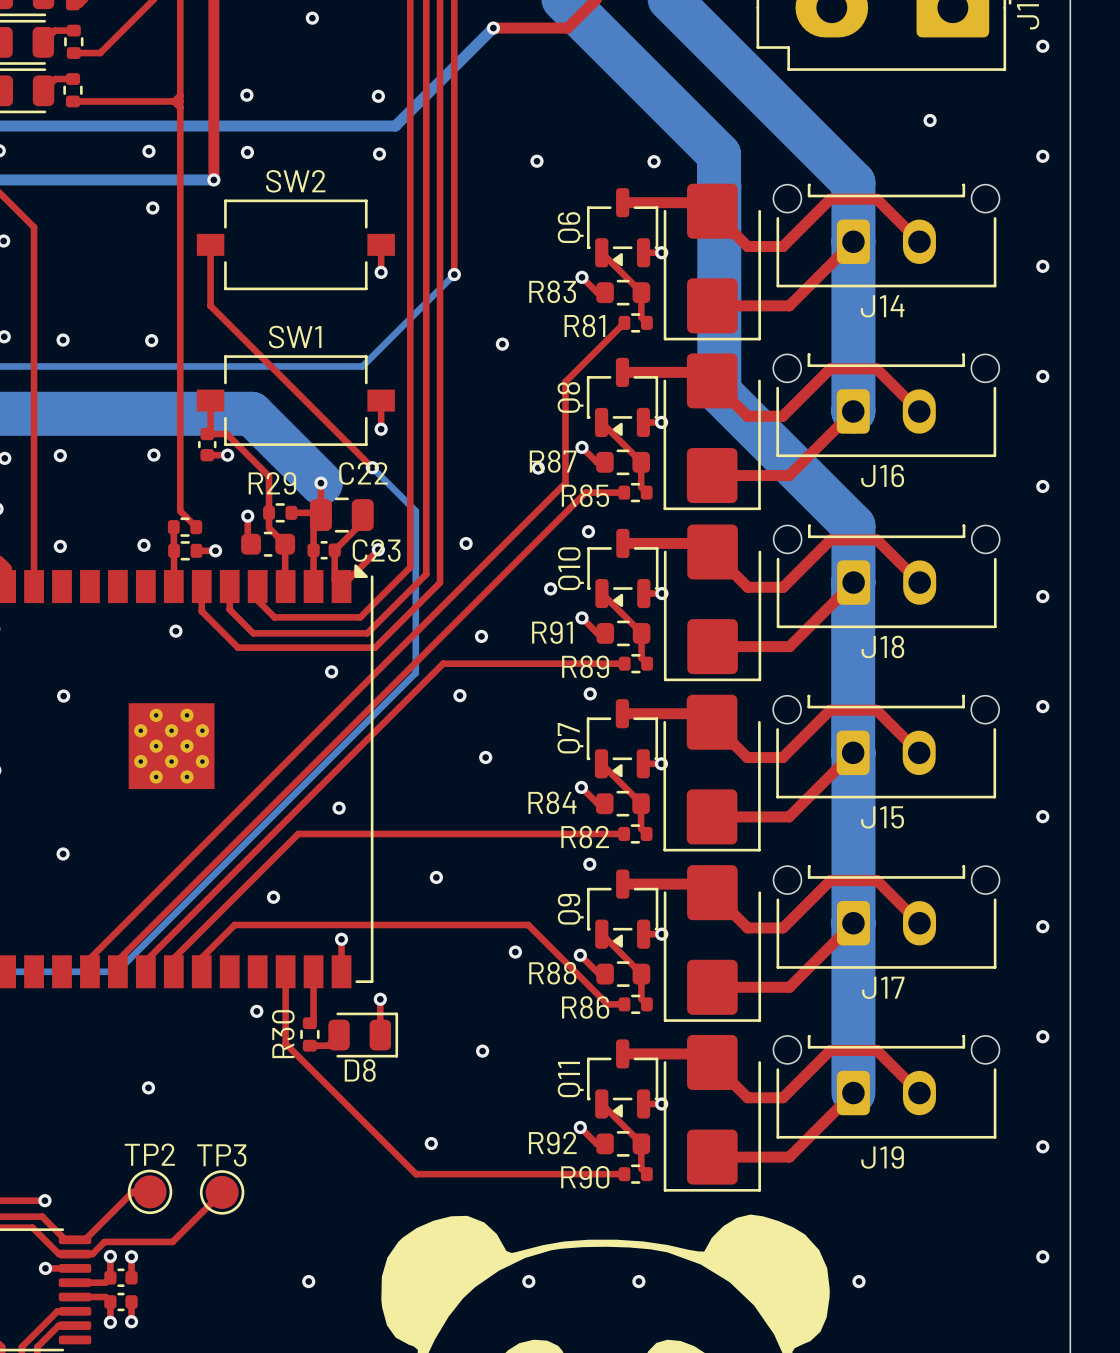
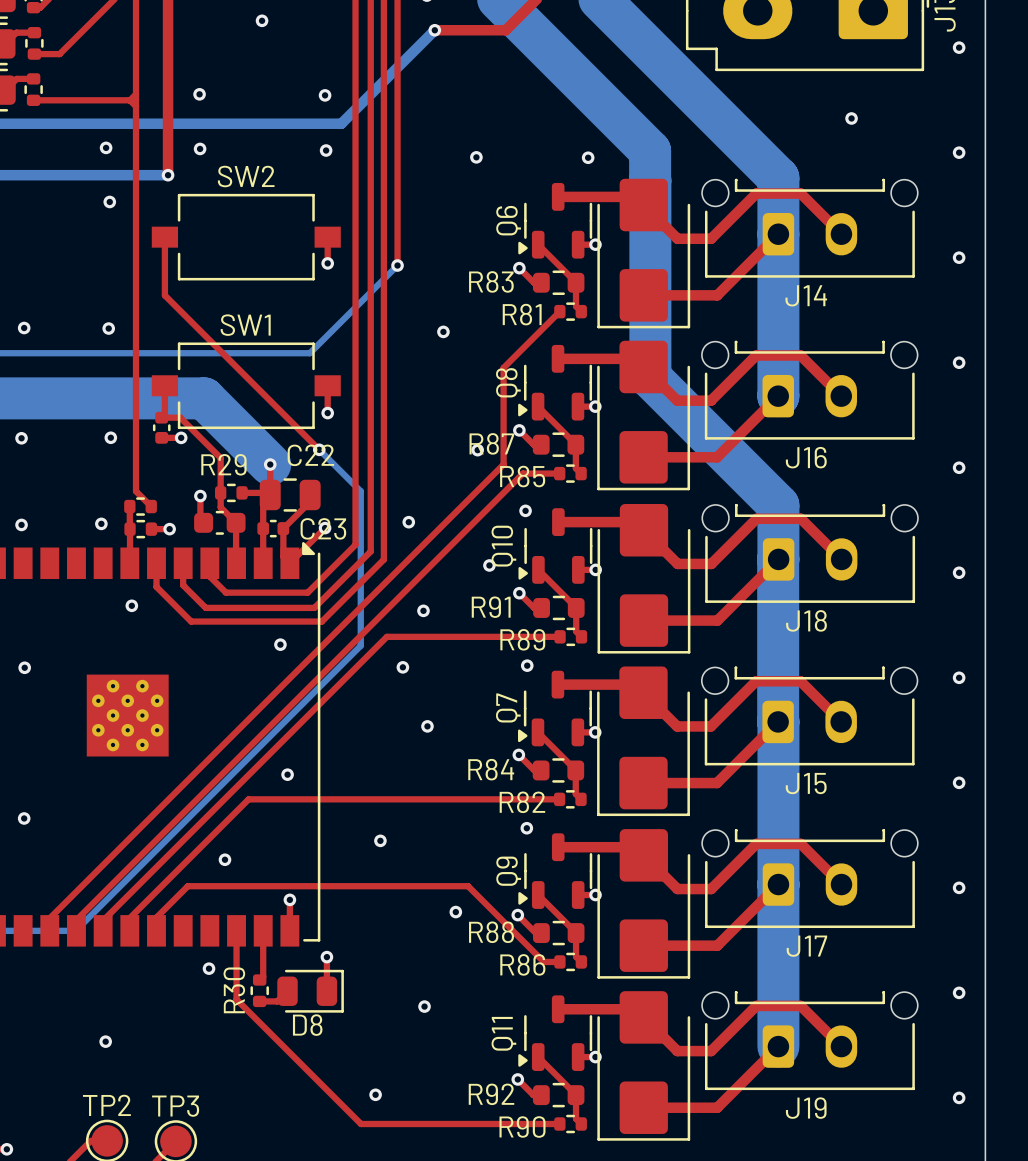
Q6 footprint: [587, 188, 659, 268] -> [518, 182, 593, 259]
Q8 footprint: [586, 357, 659, 438] -> [518, 344, 593, 421]
Q10 footprint: [587, 528, 659, 609] -> [518, 508, 593, 584]
Q7 footprint: [586, 699, 659, 779] -> [518, 670, 592, 747]
Q9 footprint: [587, 869, 659, 949] -> [518, 833, 593, 909]
Q11 footprint: [587, 1039, 659, 1119] -> [518, 995, 593, 1071]

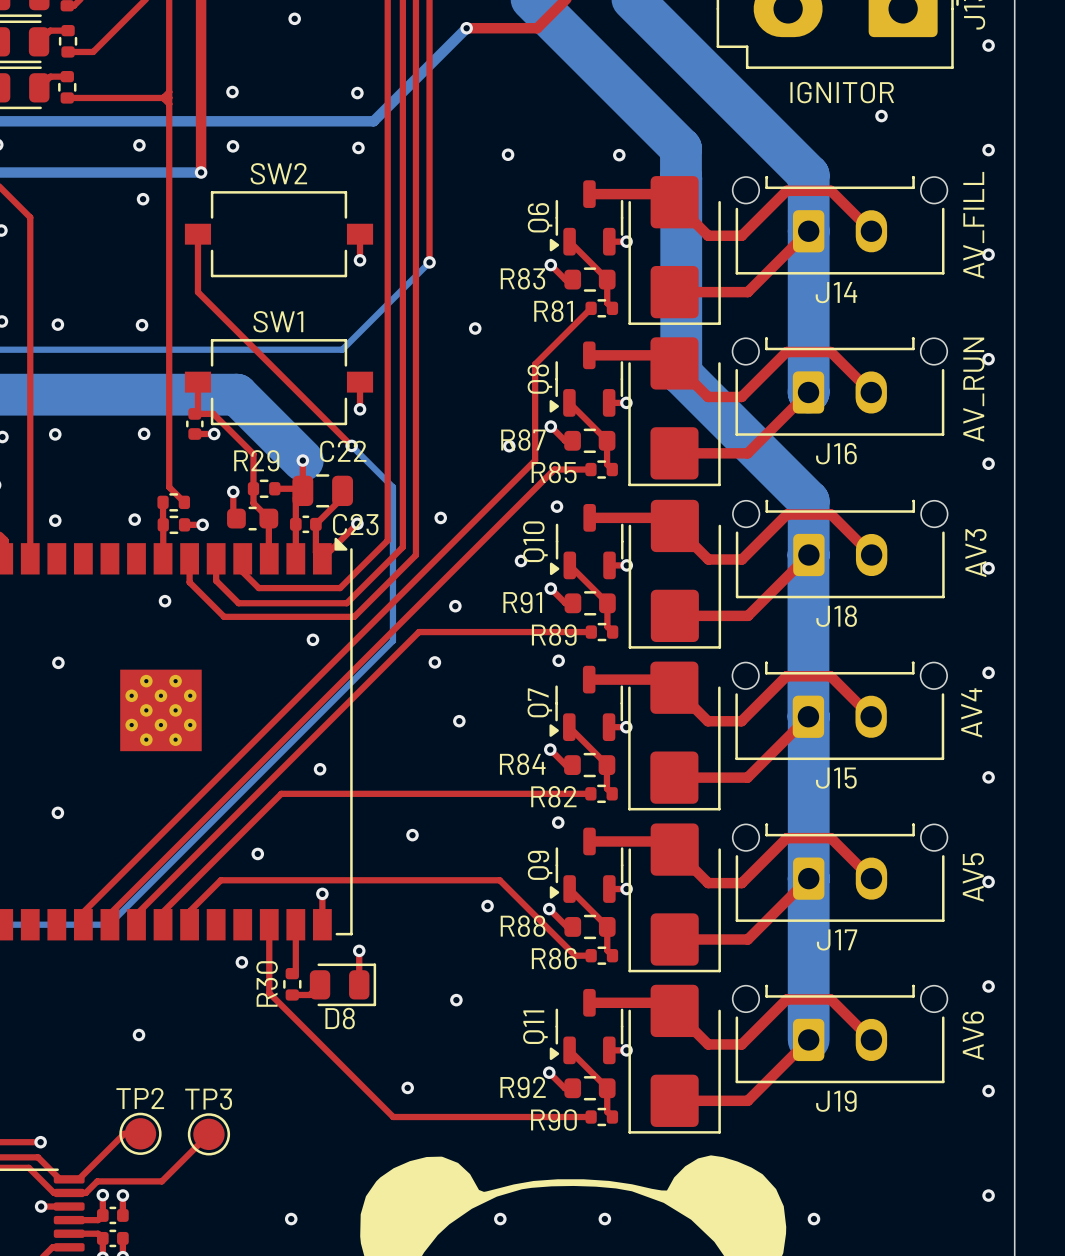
text: none -> IGNITOR (842, 92)
text: none -> AV_FILL (973, 225)
text: none -> AV_RUN (973, 389)
text: none -> AV3 (975, 553)
text: none -> AV4 (971, 712)
text: none -> AV5 (973, 877)
text: none -> AV6 (973, 1035)

